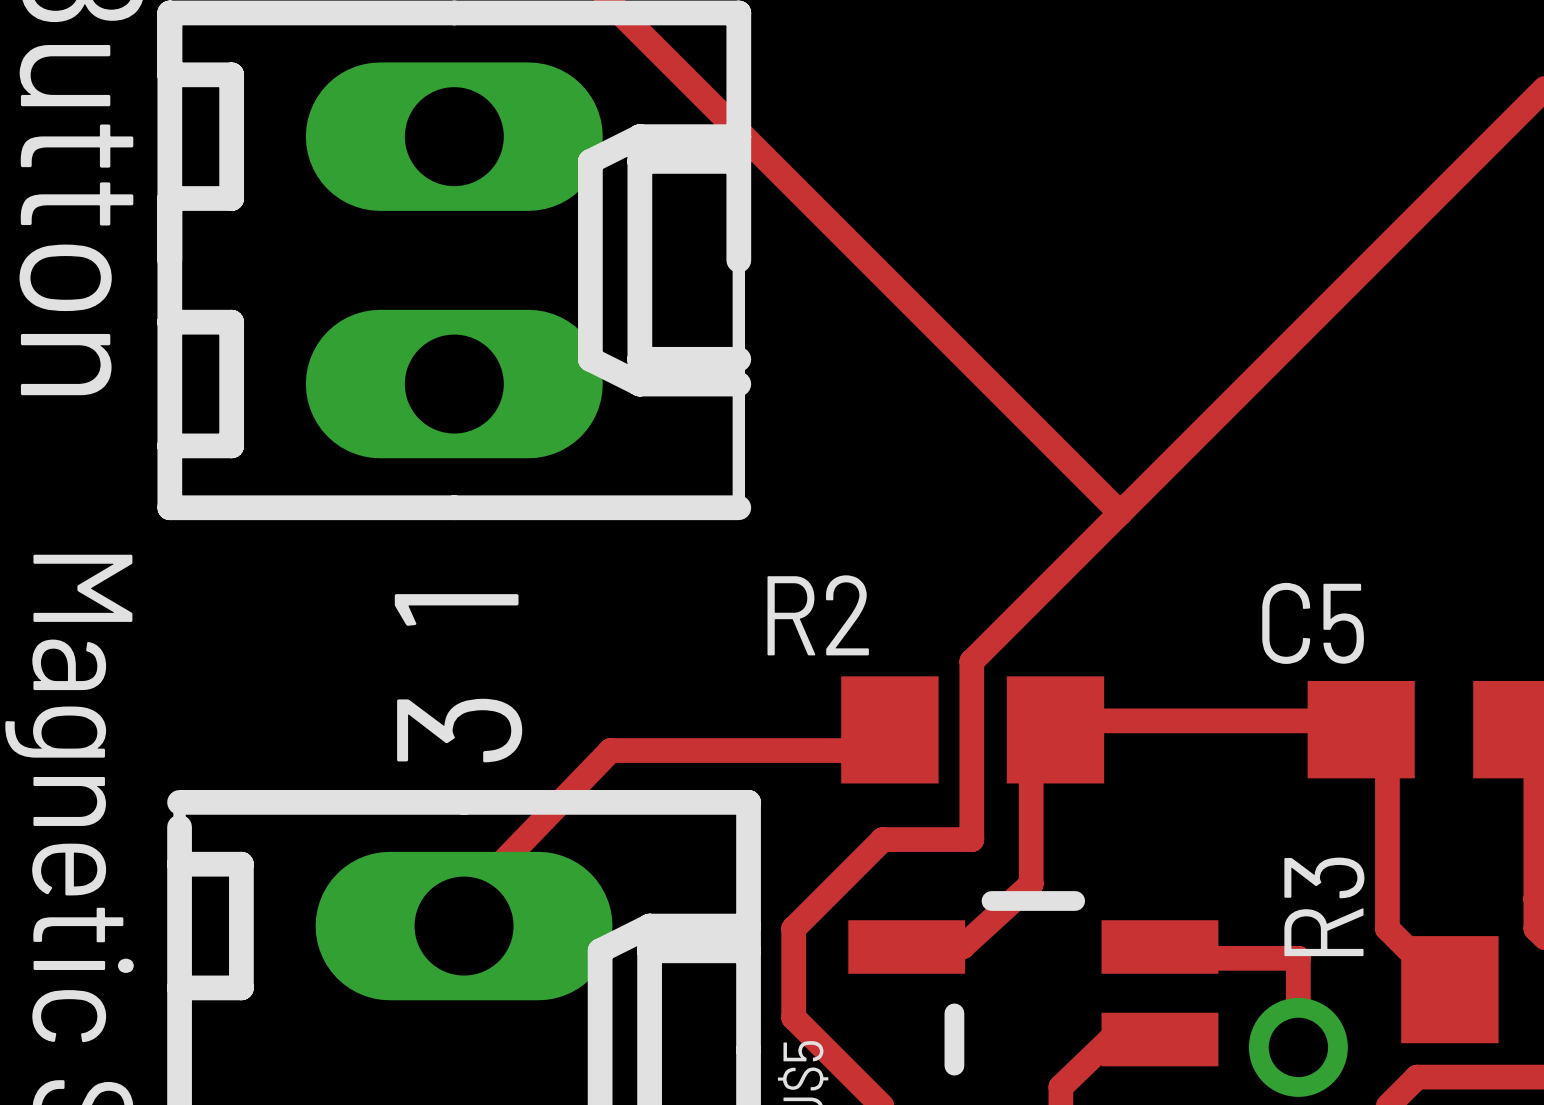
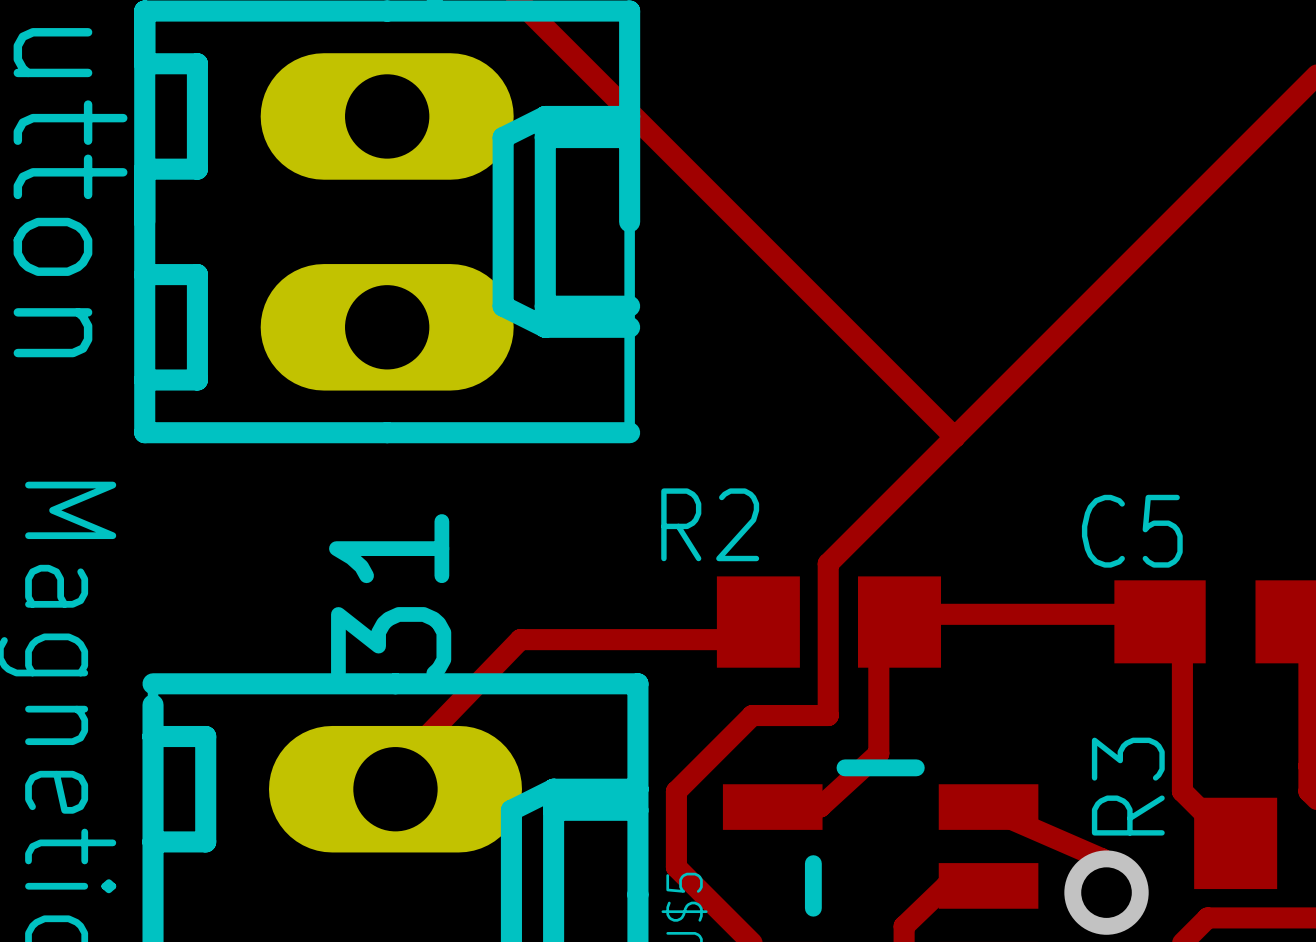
track: (1179, 958) (1298, 958) (1298, 1047) -> (1005, 816) (1102, 858) (1106, 892)

